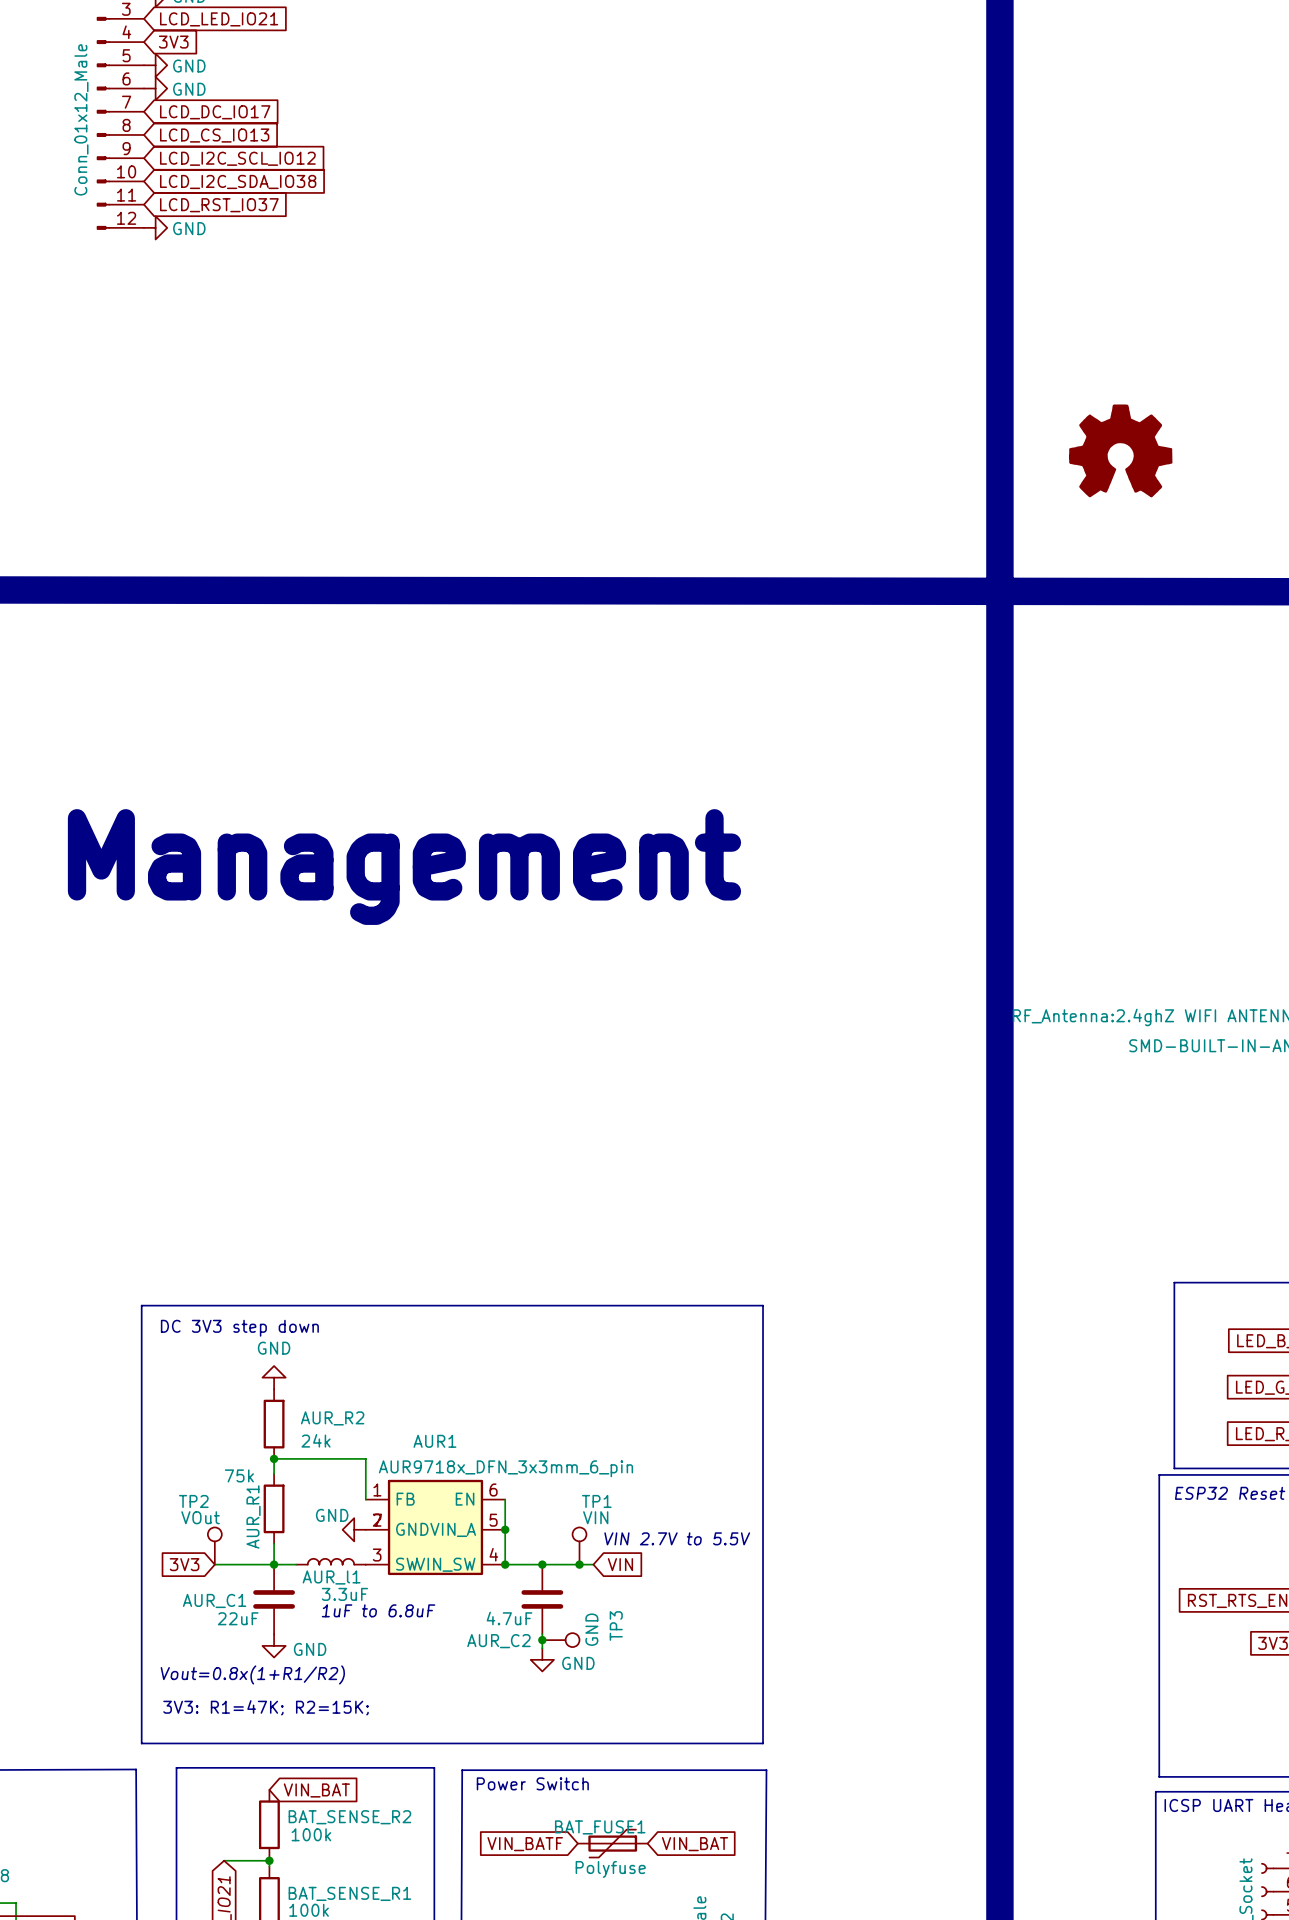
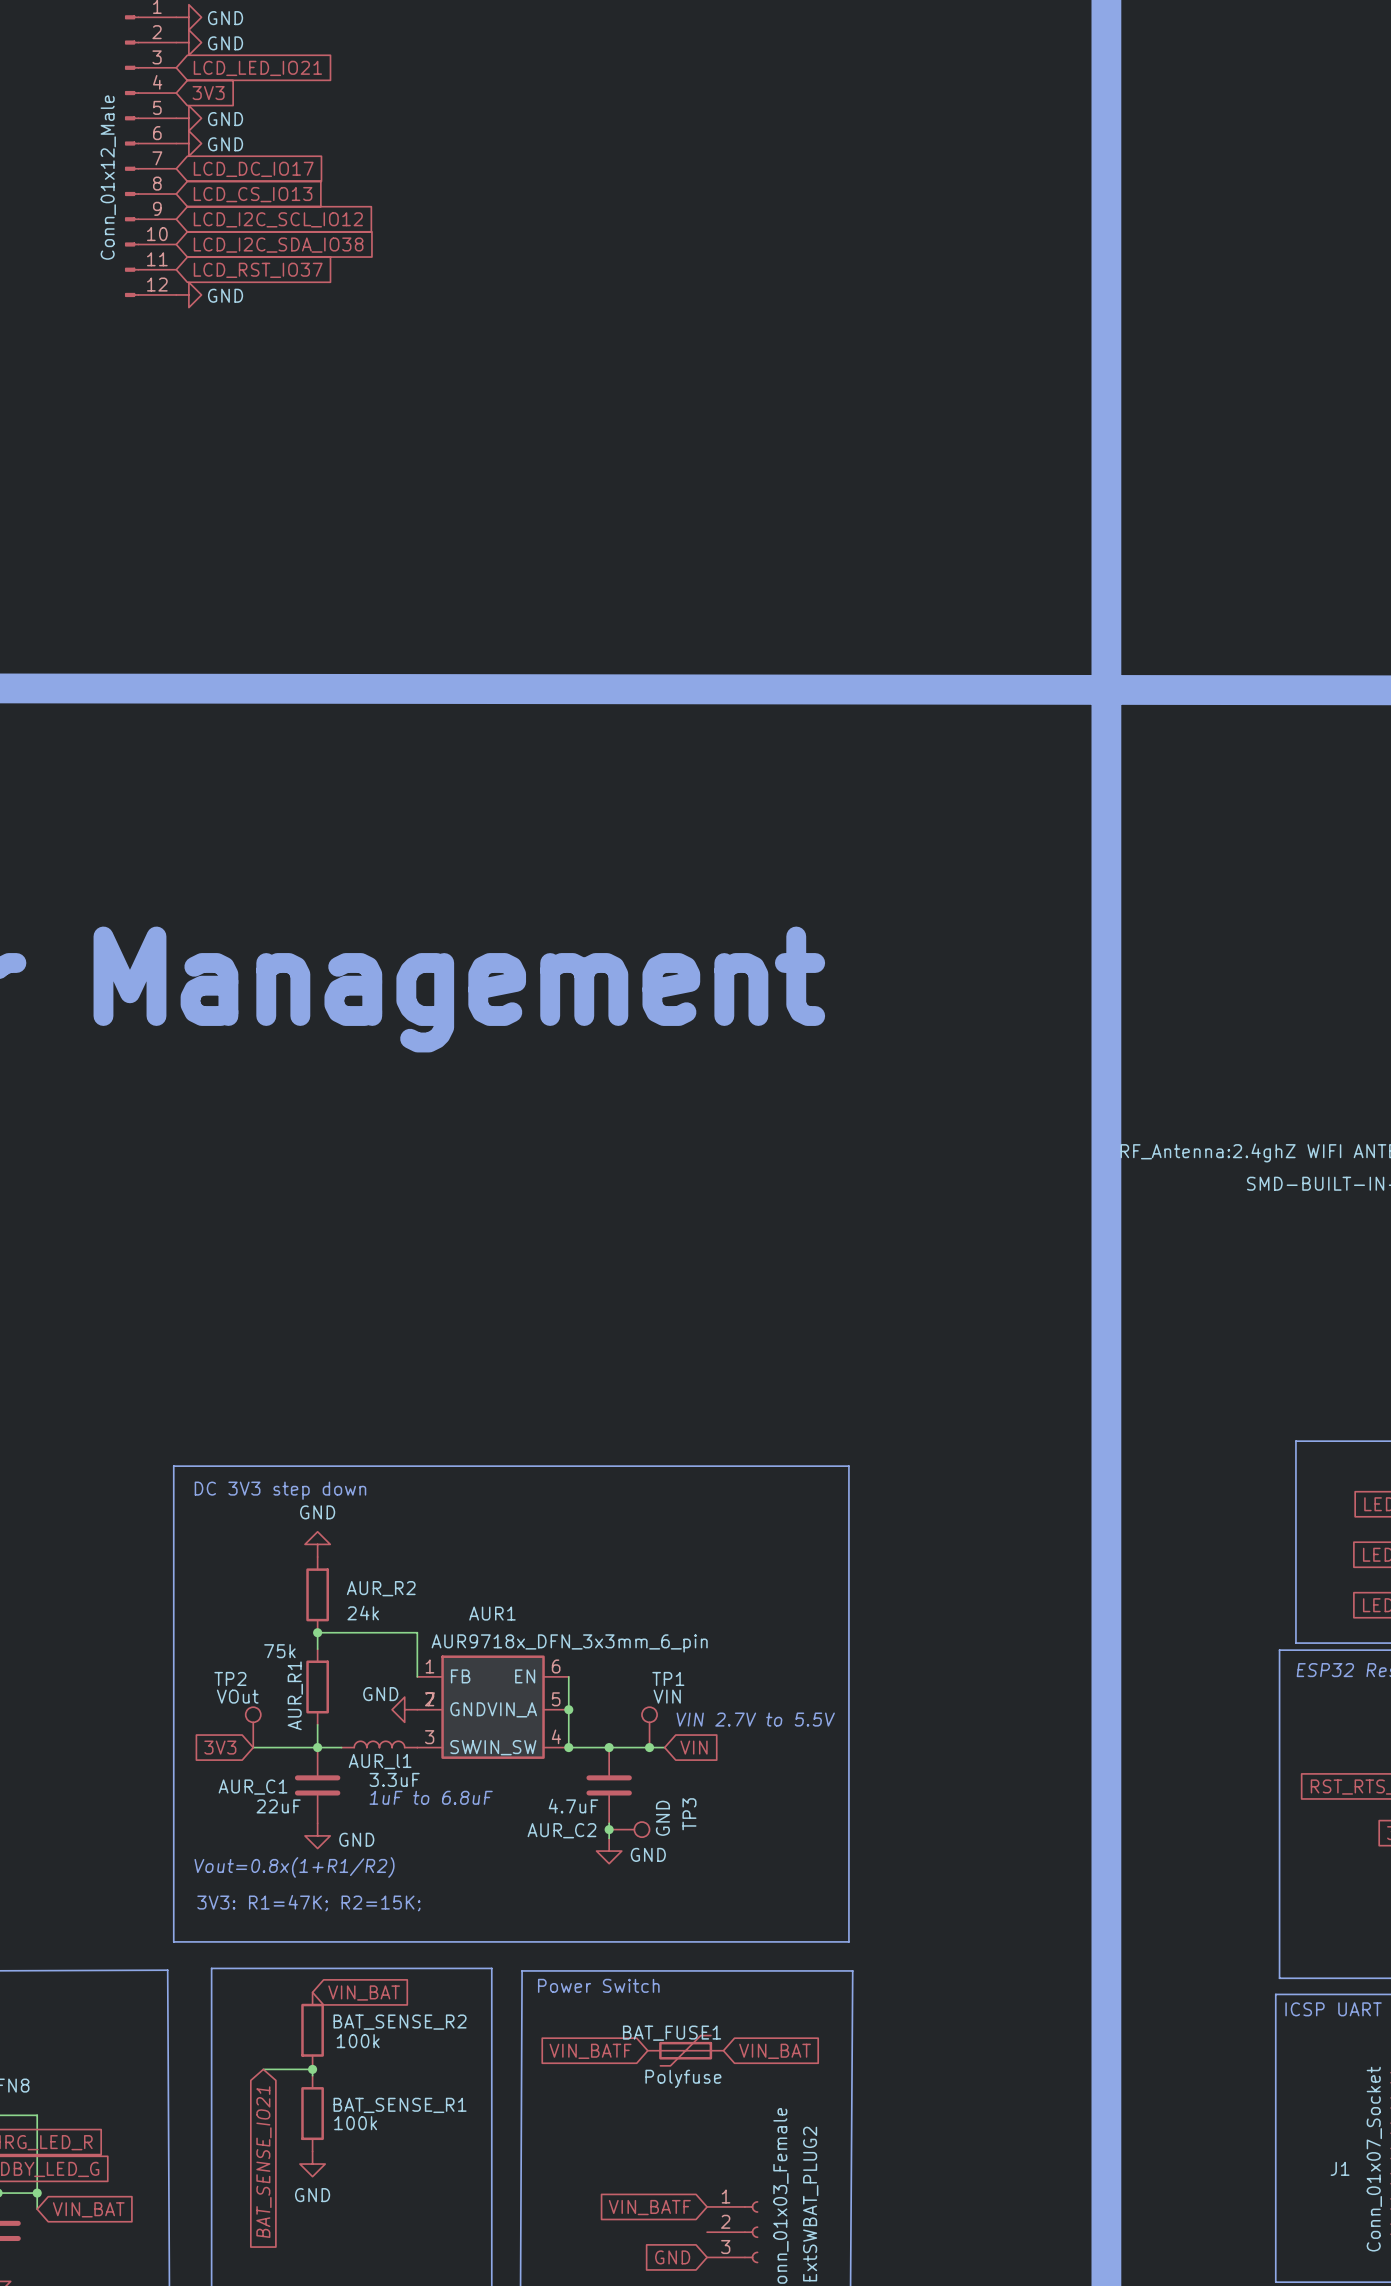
power symbol: (1120, 450) -> none

